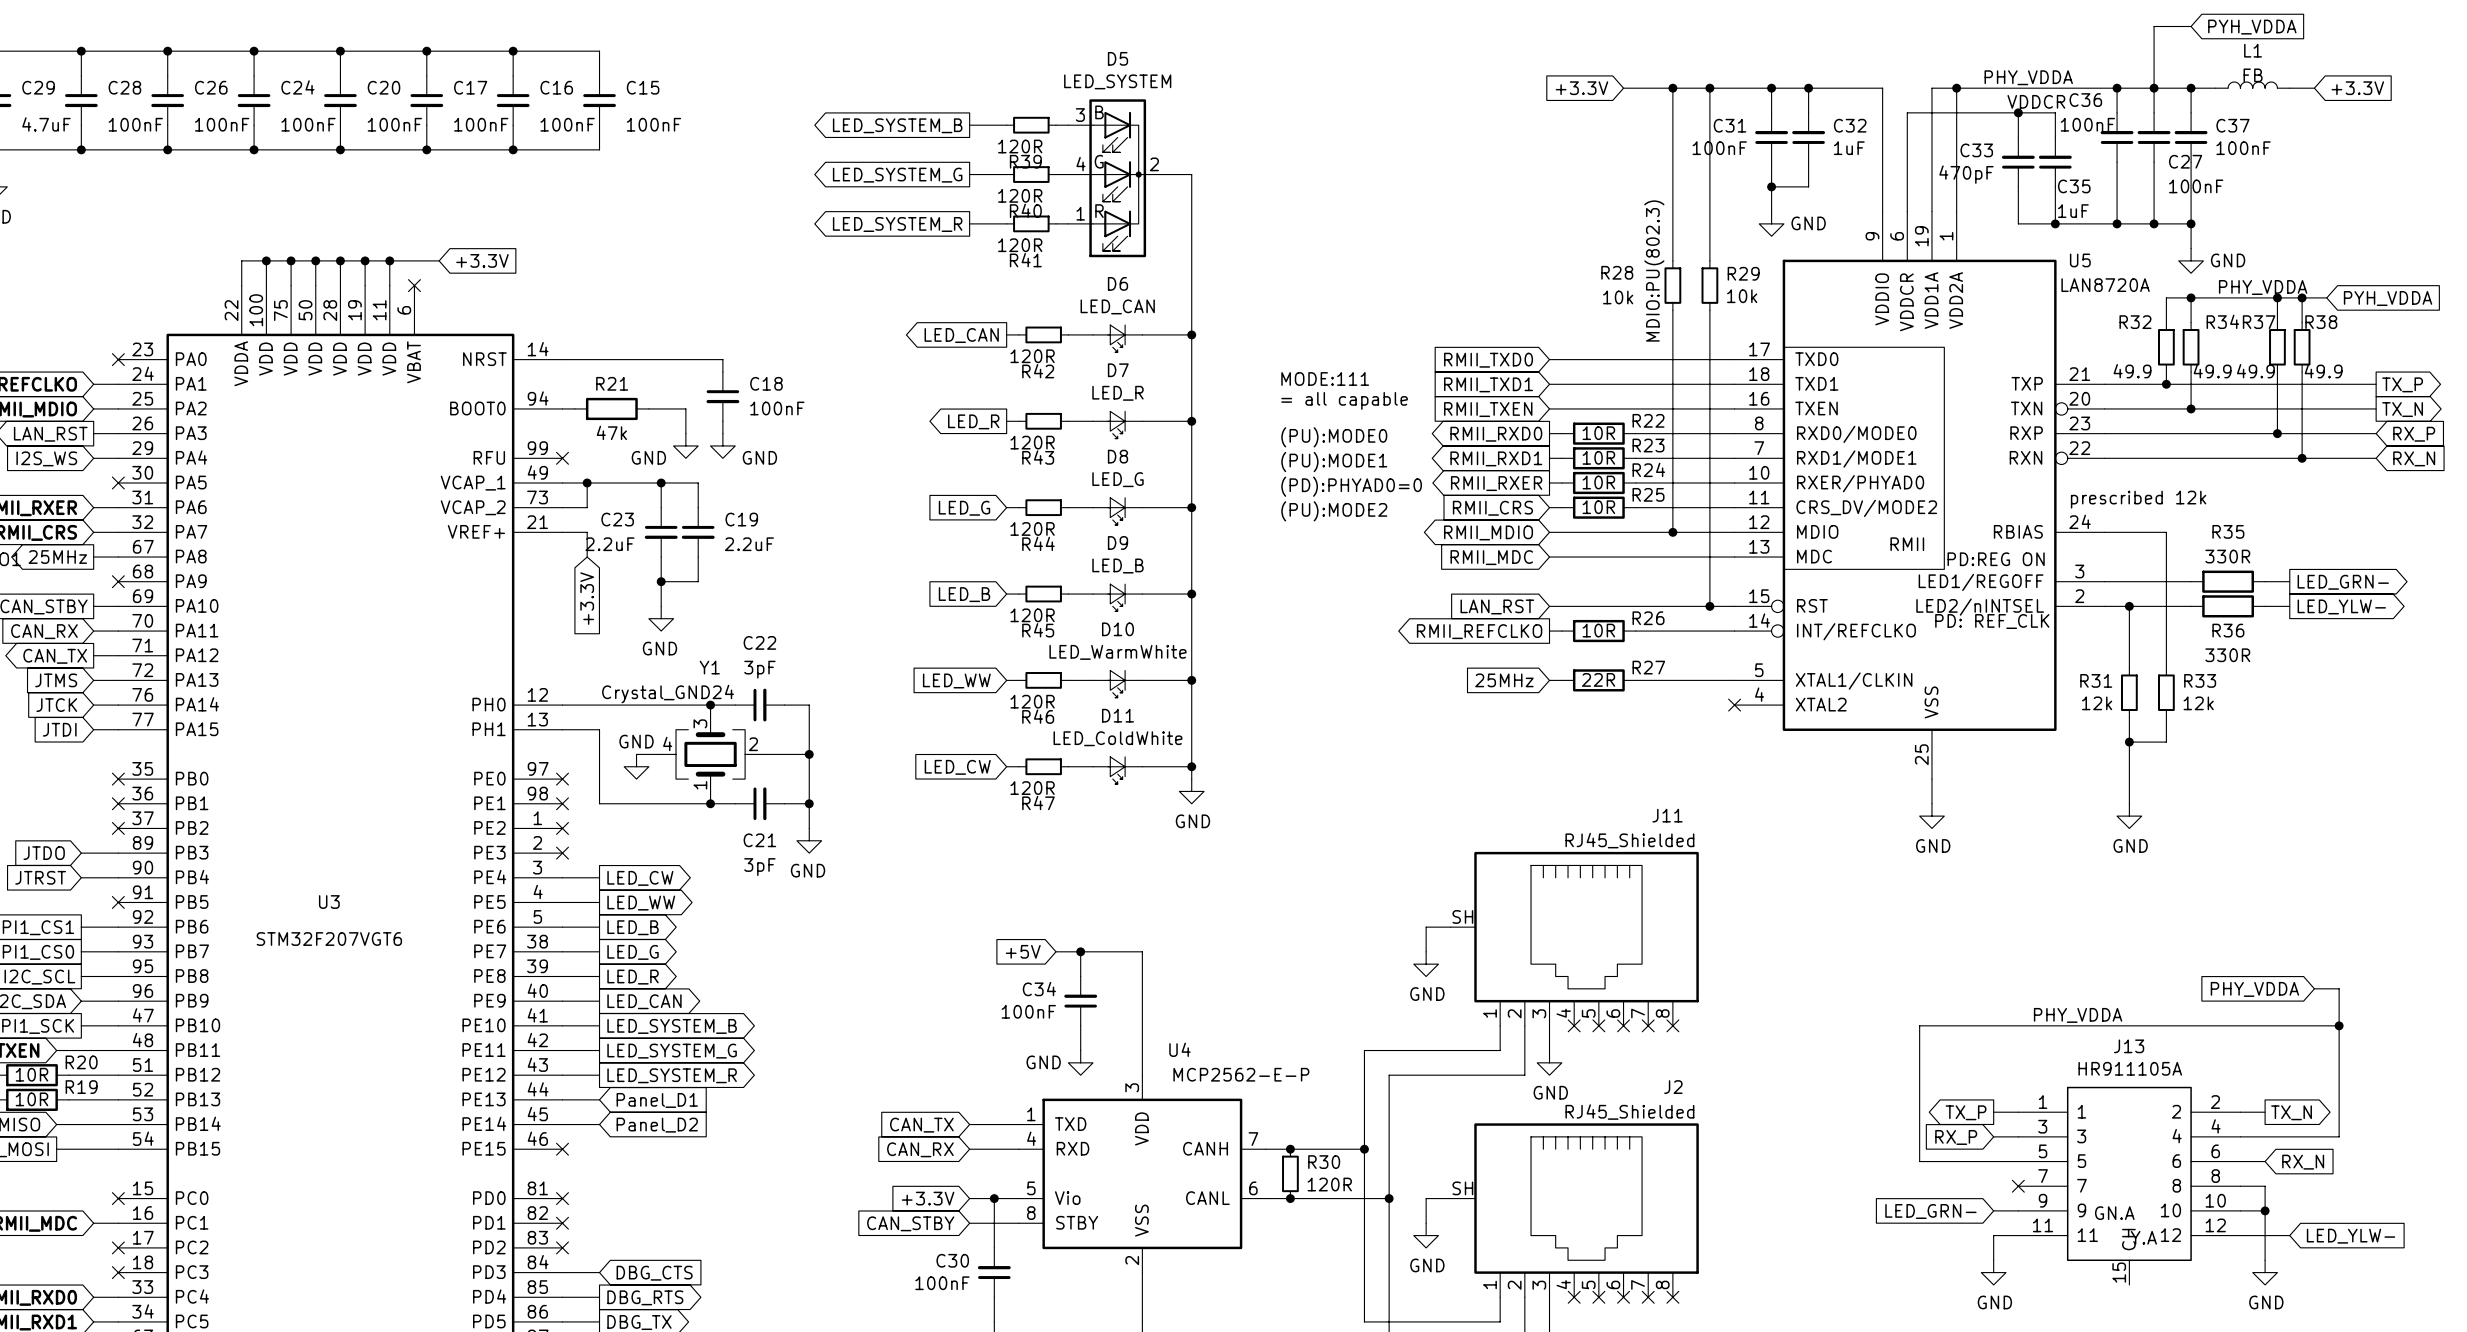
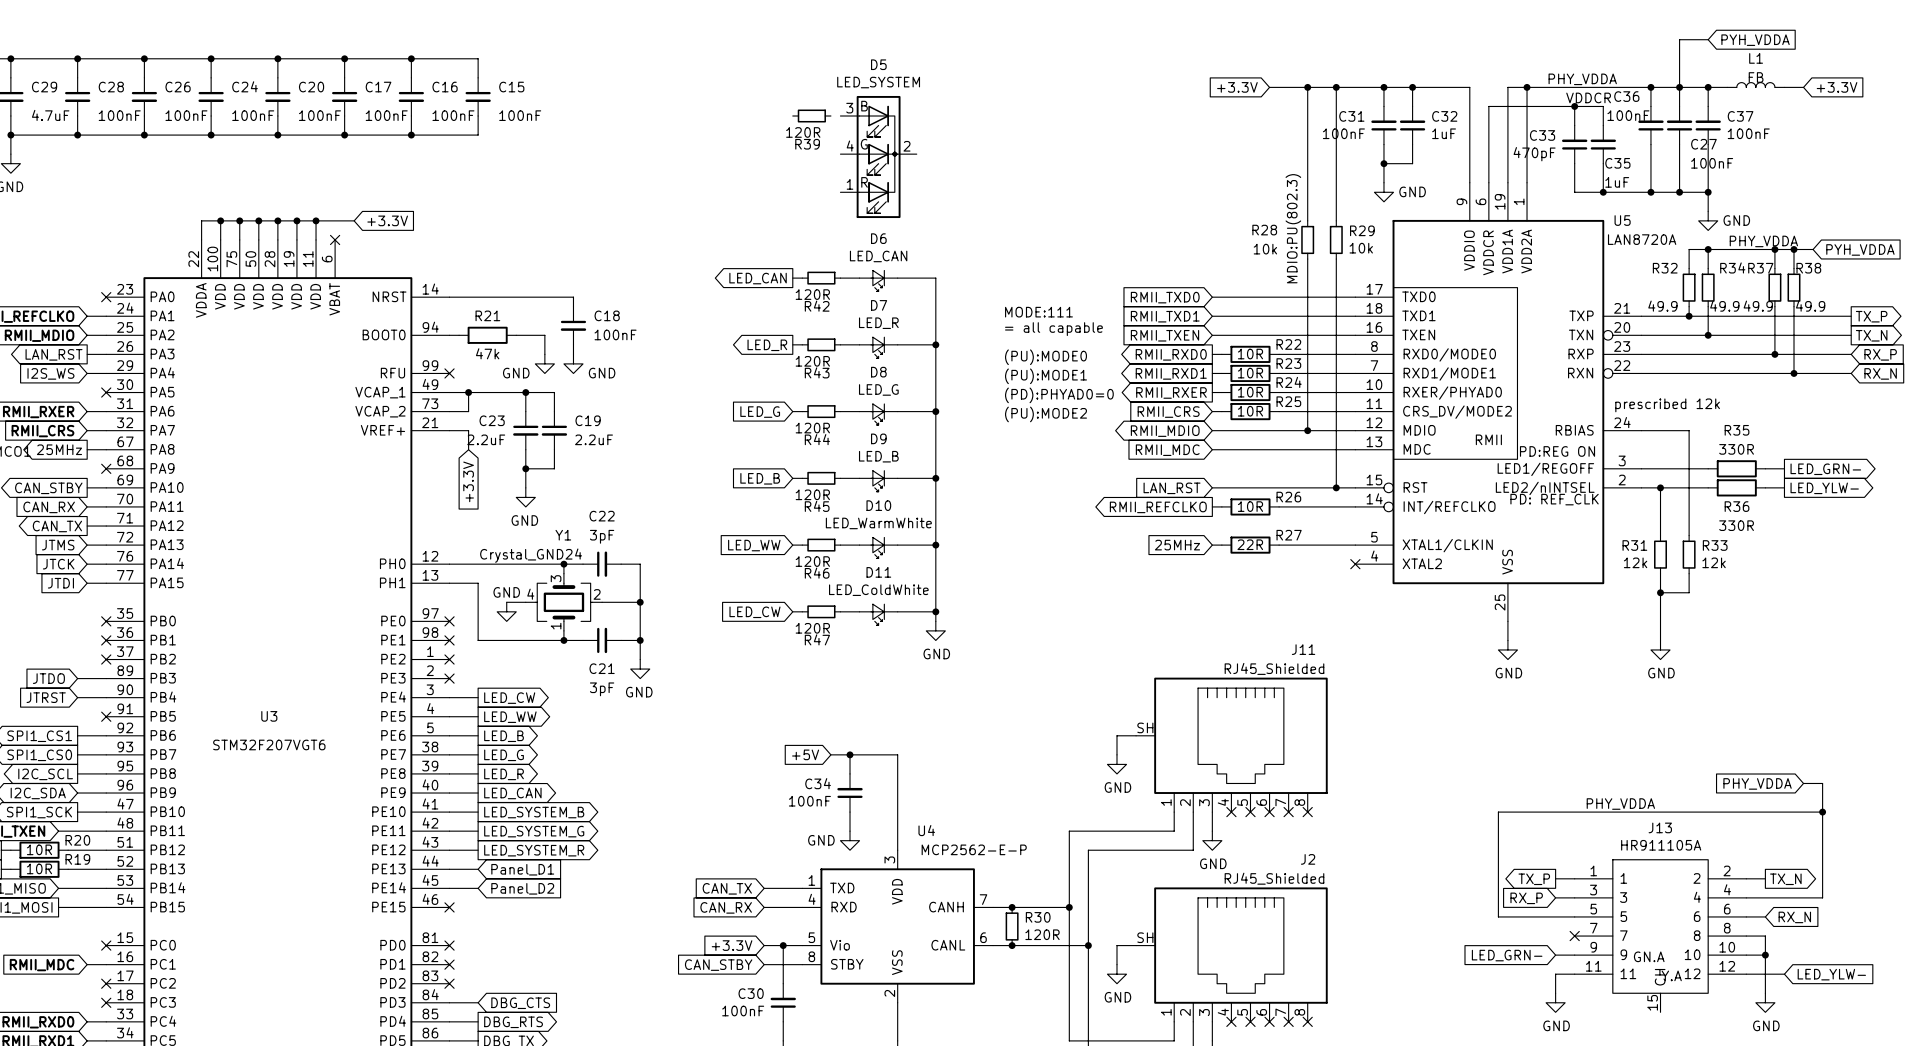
global label: LED_SYSTEM_B (897, 125) -> none
wire: (969, 125) (1006, 125) -> none
wire: (1056, 125) (1068, 125) -> none
wire: (969, 174) (1006, 174) -> none
R40: 120R (1031, 174) -> none
wire: (1056, 174) (1068, 174) -> none
wire: (1167, 174) (1191, 174) (1191, 334) -> none
global label: LED_SYSTEM_G (897, 175) -> none
wire: (969, 223) (1006, 223) -> none
R41: 120R (1031, 223) -> none
wire: (1056, 223) (1068, 223) -> none
global label: LED_SYSTEM_R (897, 224) -> none
junction: (1191, 334) -> none

